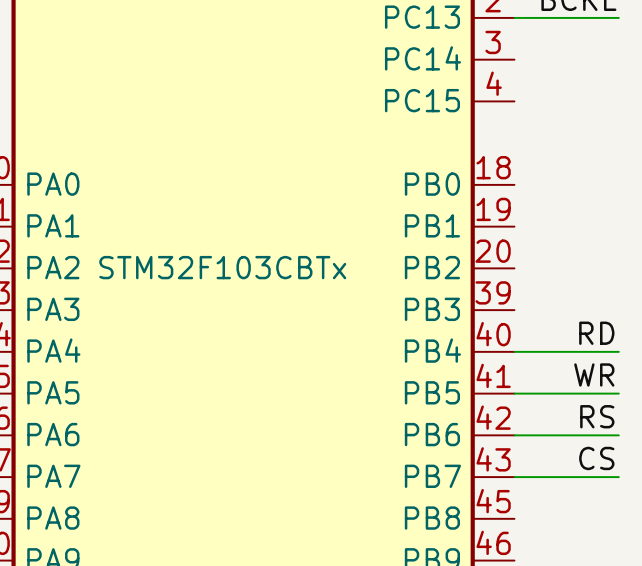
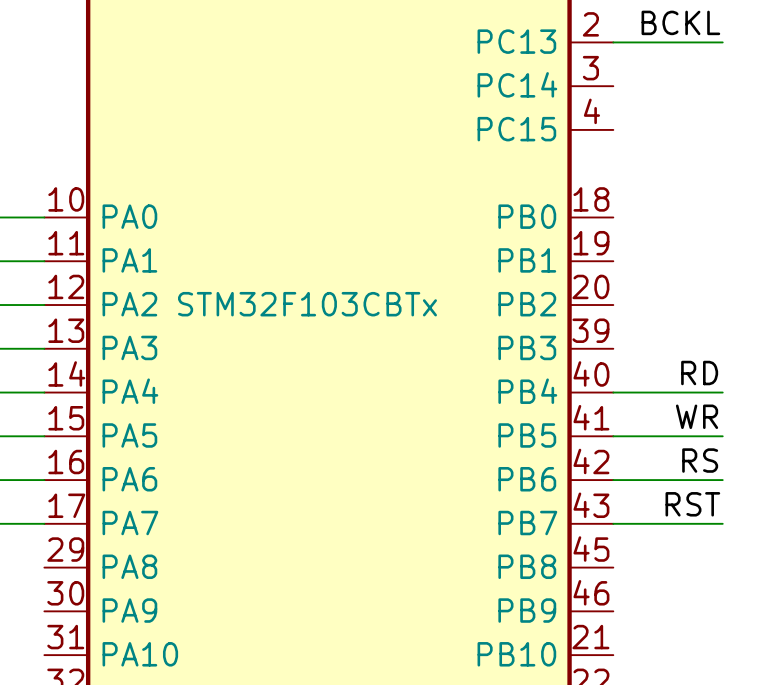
label: CS (596, 458) -> RST (692, 504)

